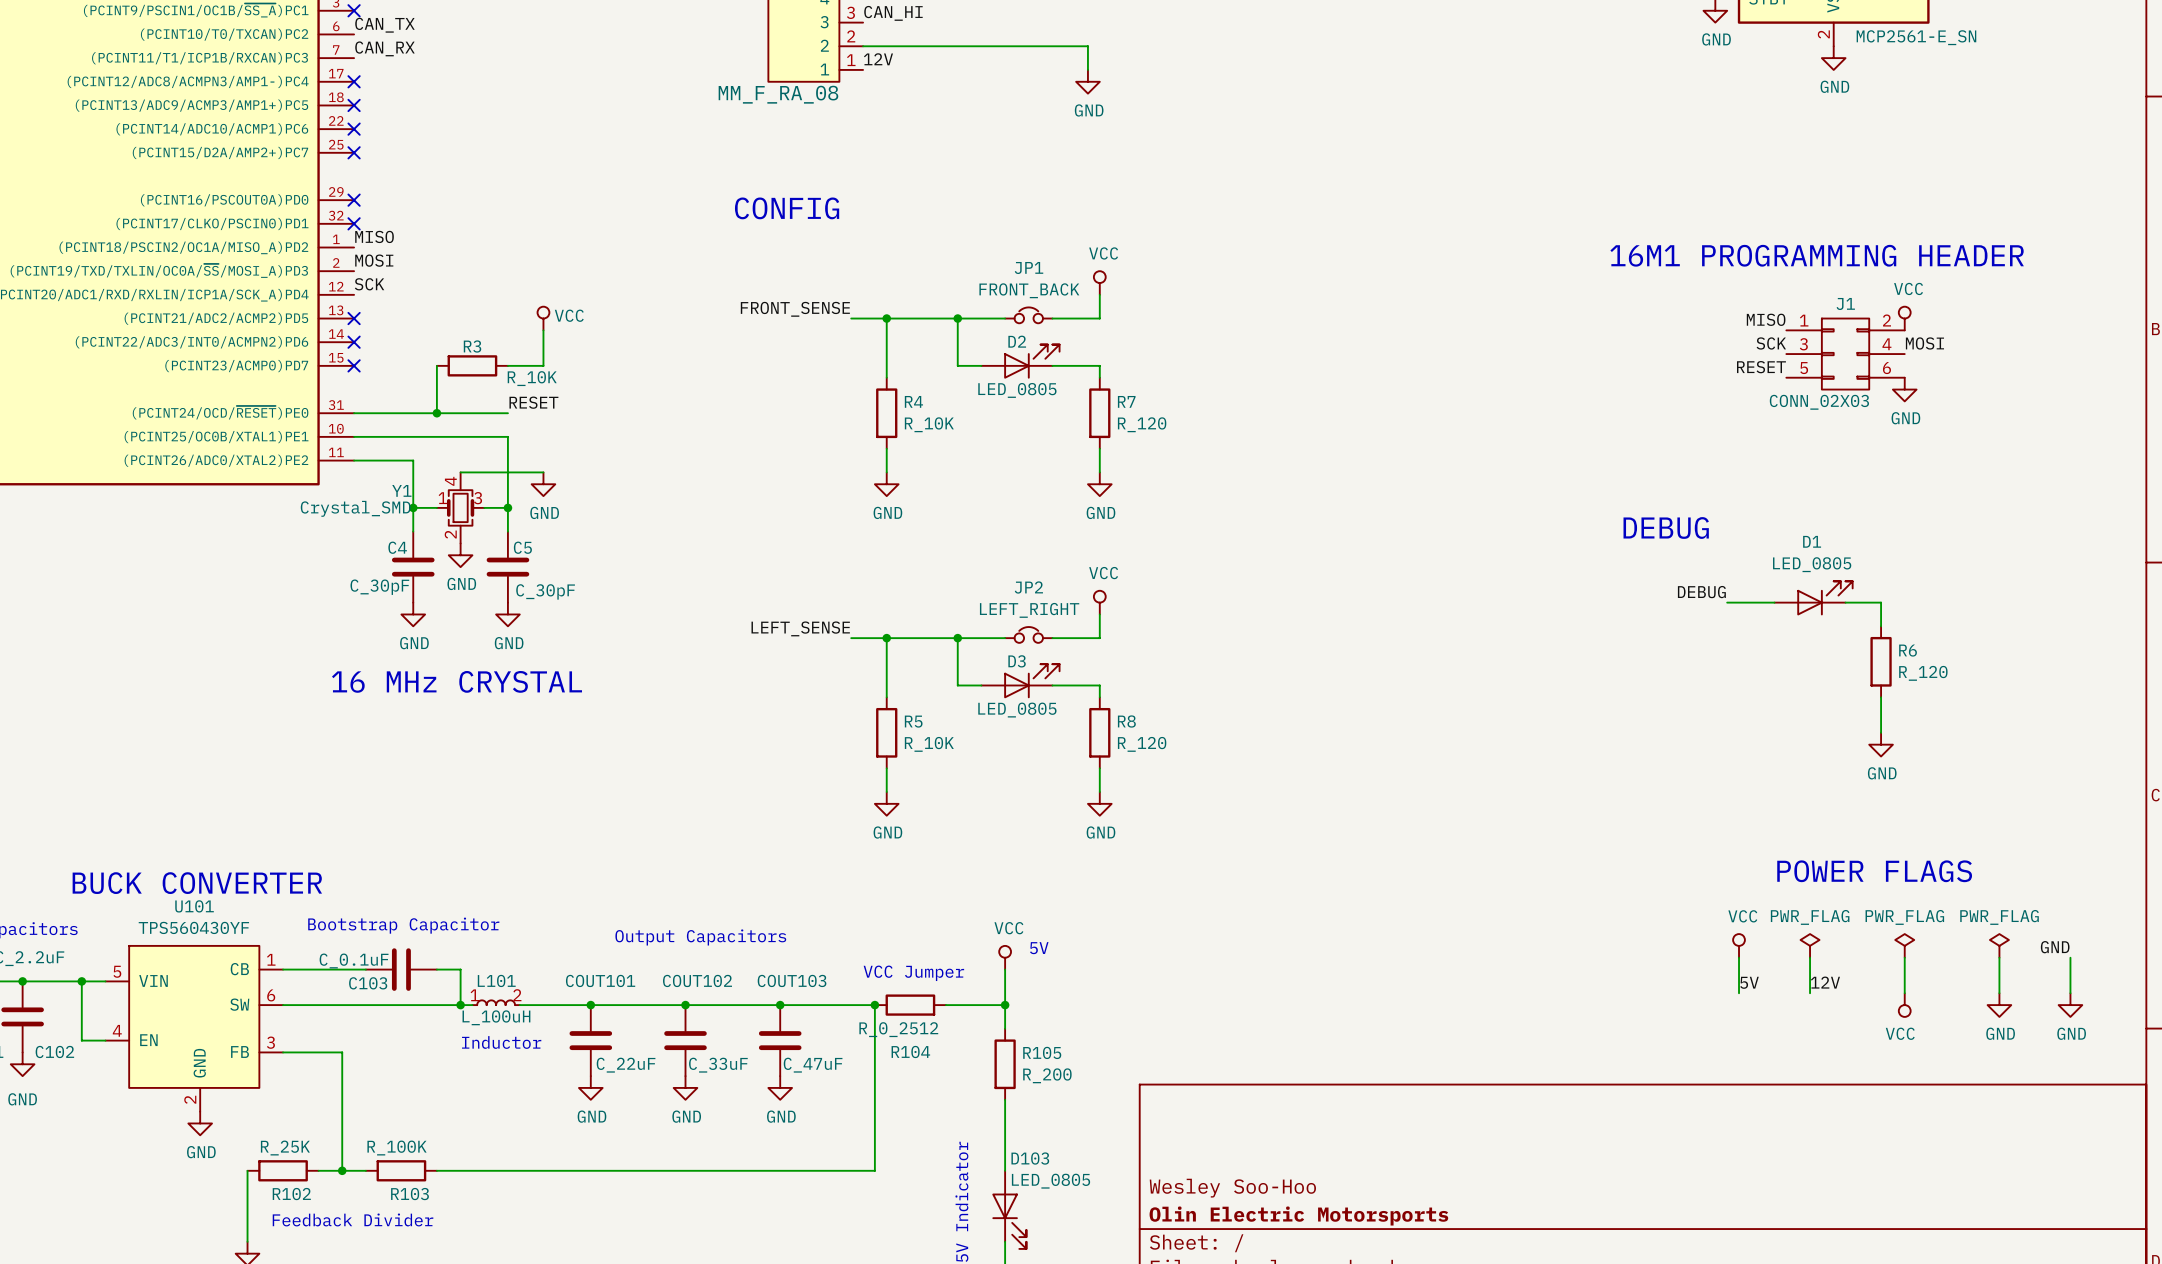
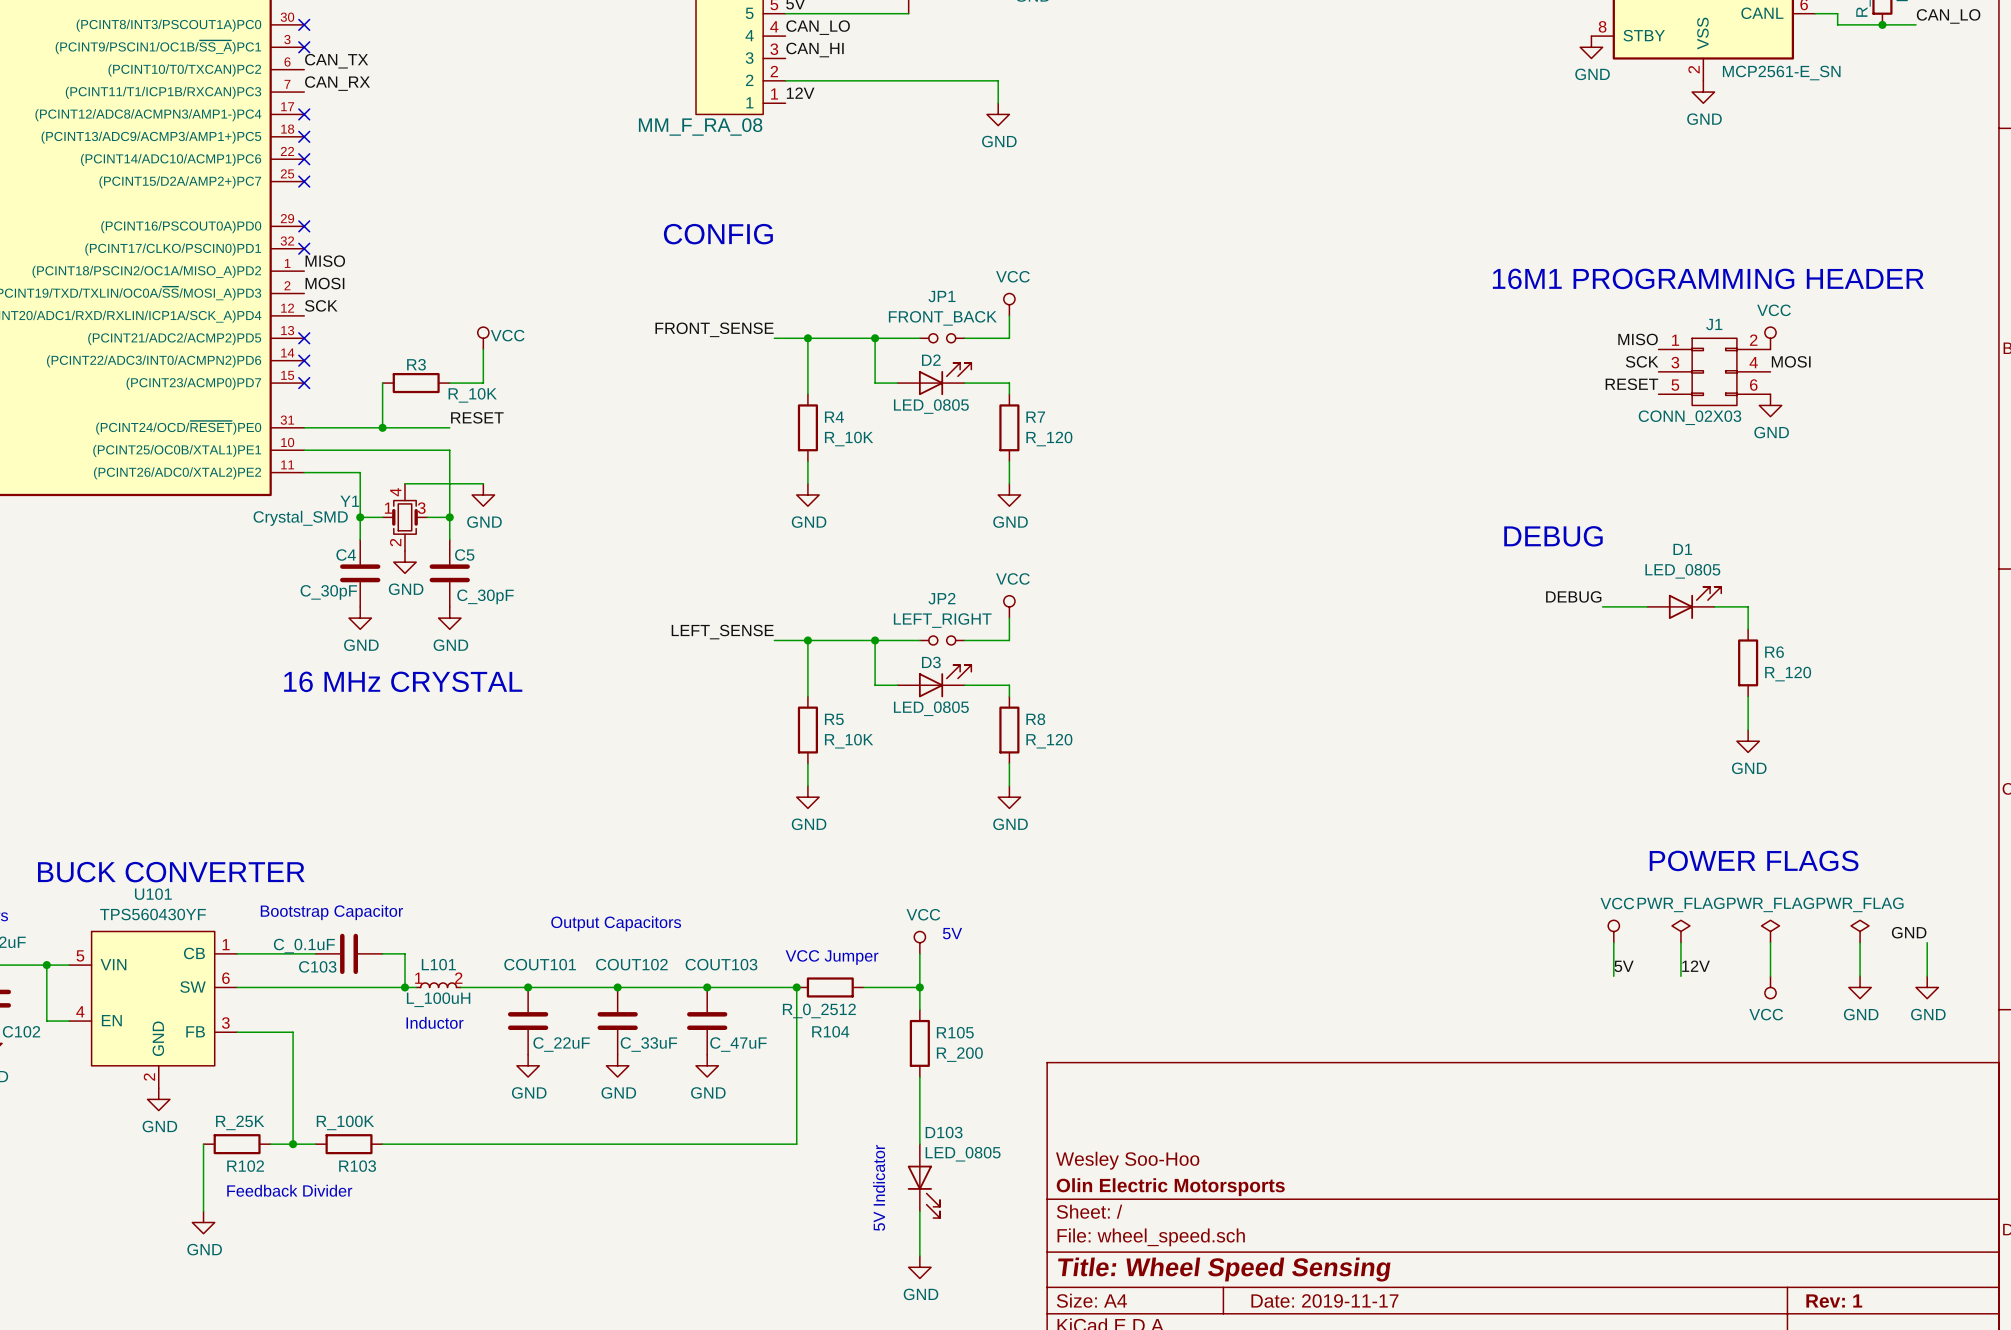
JP1 symbol: [1005, 307, 1053, 324] -> [919, 333, 965, 343]
JP2 symbol: [1005, 627, 1053, 643] -> [919, 636, 965, 645]

